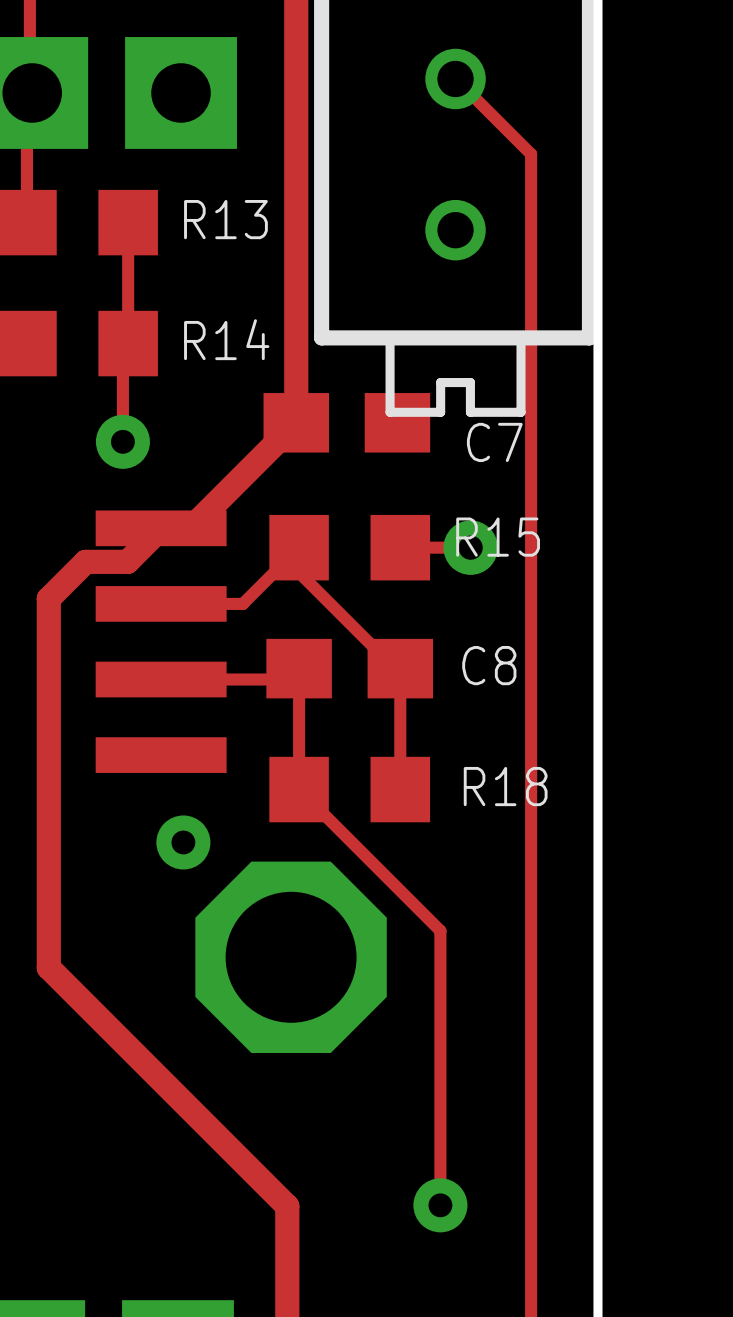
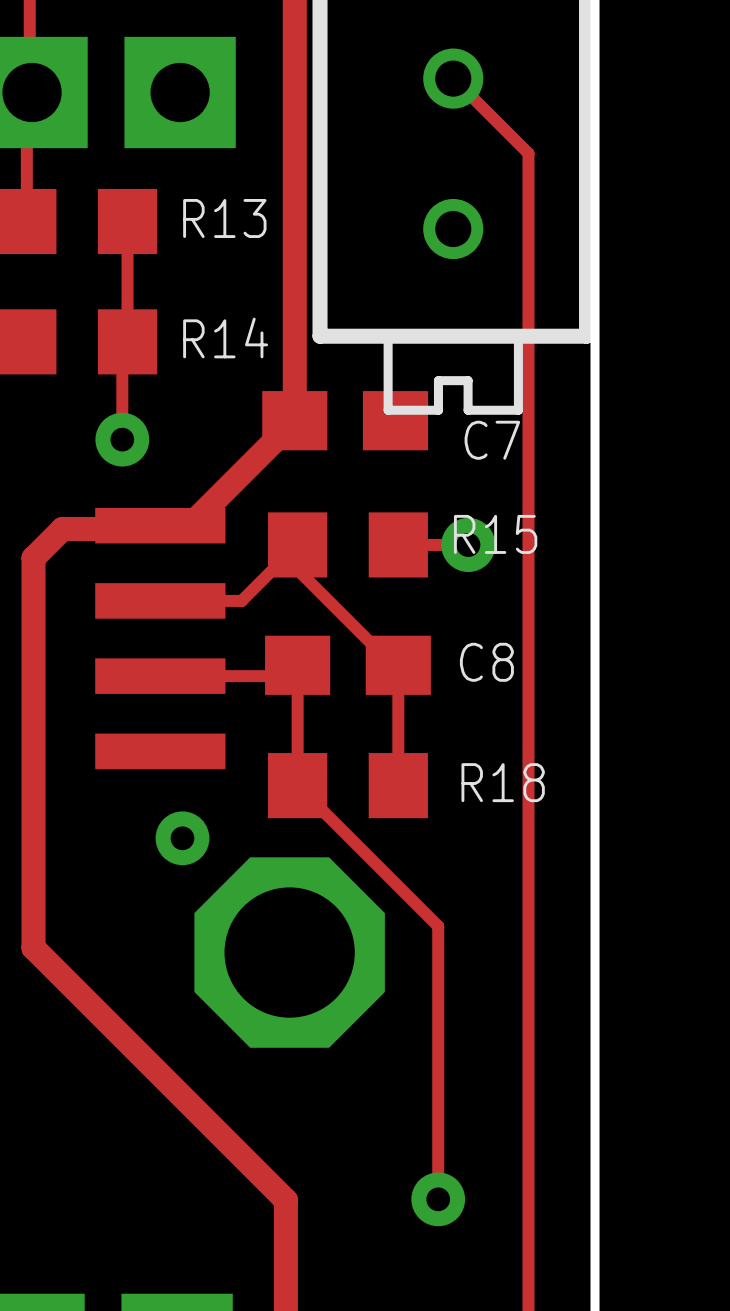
track: (157, 531) (127, 561) (85, 561) (48, 598) (48, 967) -> (157, 528) (62, 528) (33, 558) (33, 947) (48, 962)

